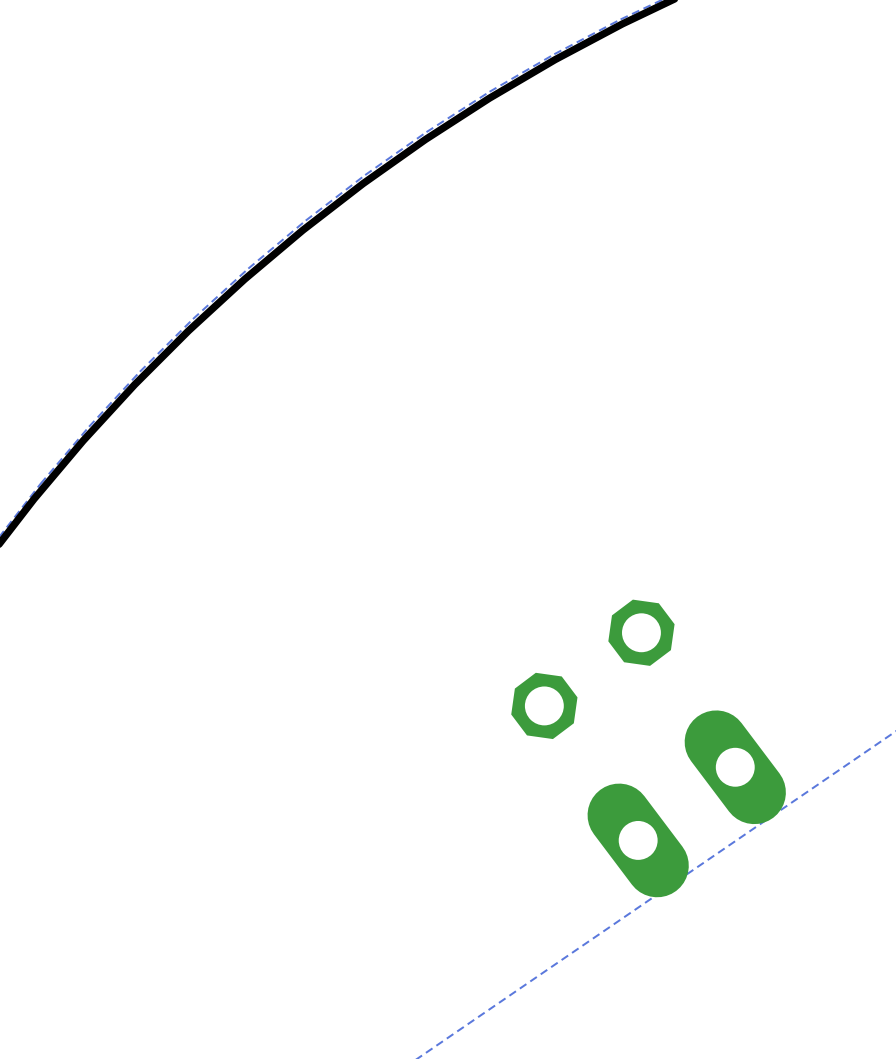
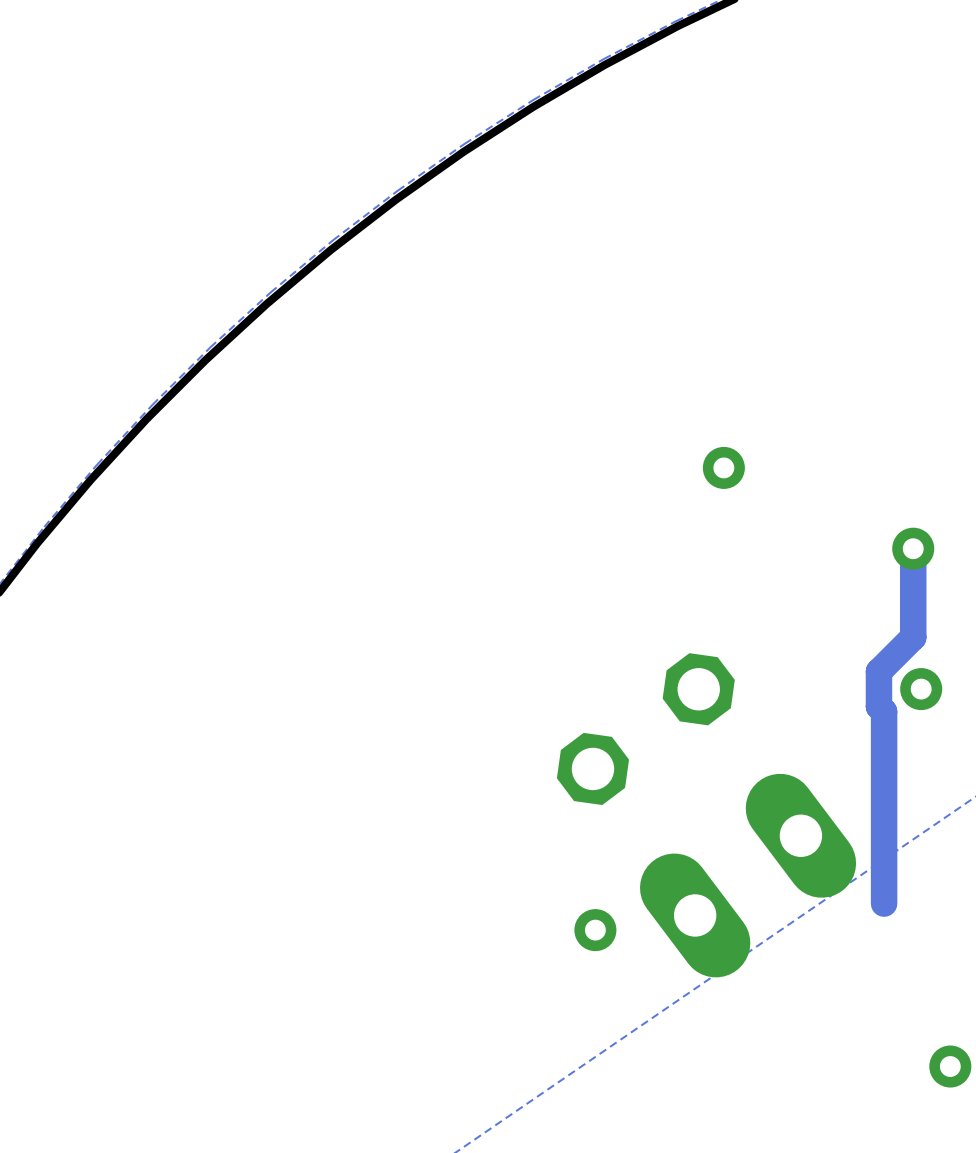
via: none -> (723, 467)
track: none -> (913, 548) (913, 637) (878, 671) (878, 706) (884, 711) (884, 903)
via: none -> (913, 548)
via: none -> (921, 689)
via: none -> (595, 930)
via: none -> (950, 1066)

